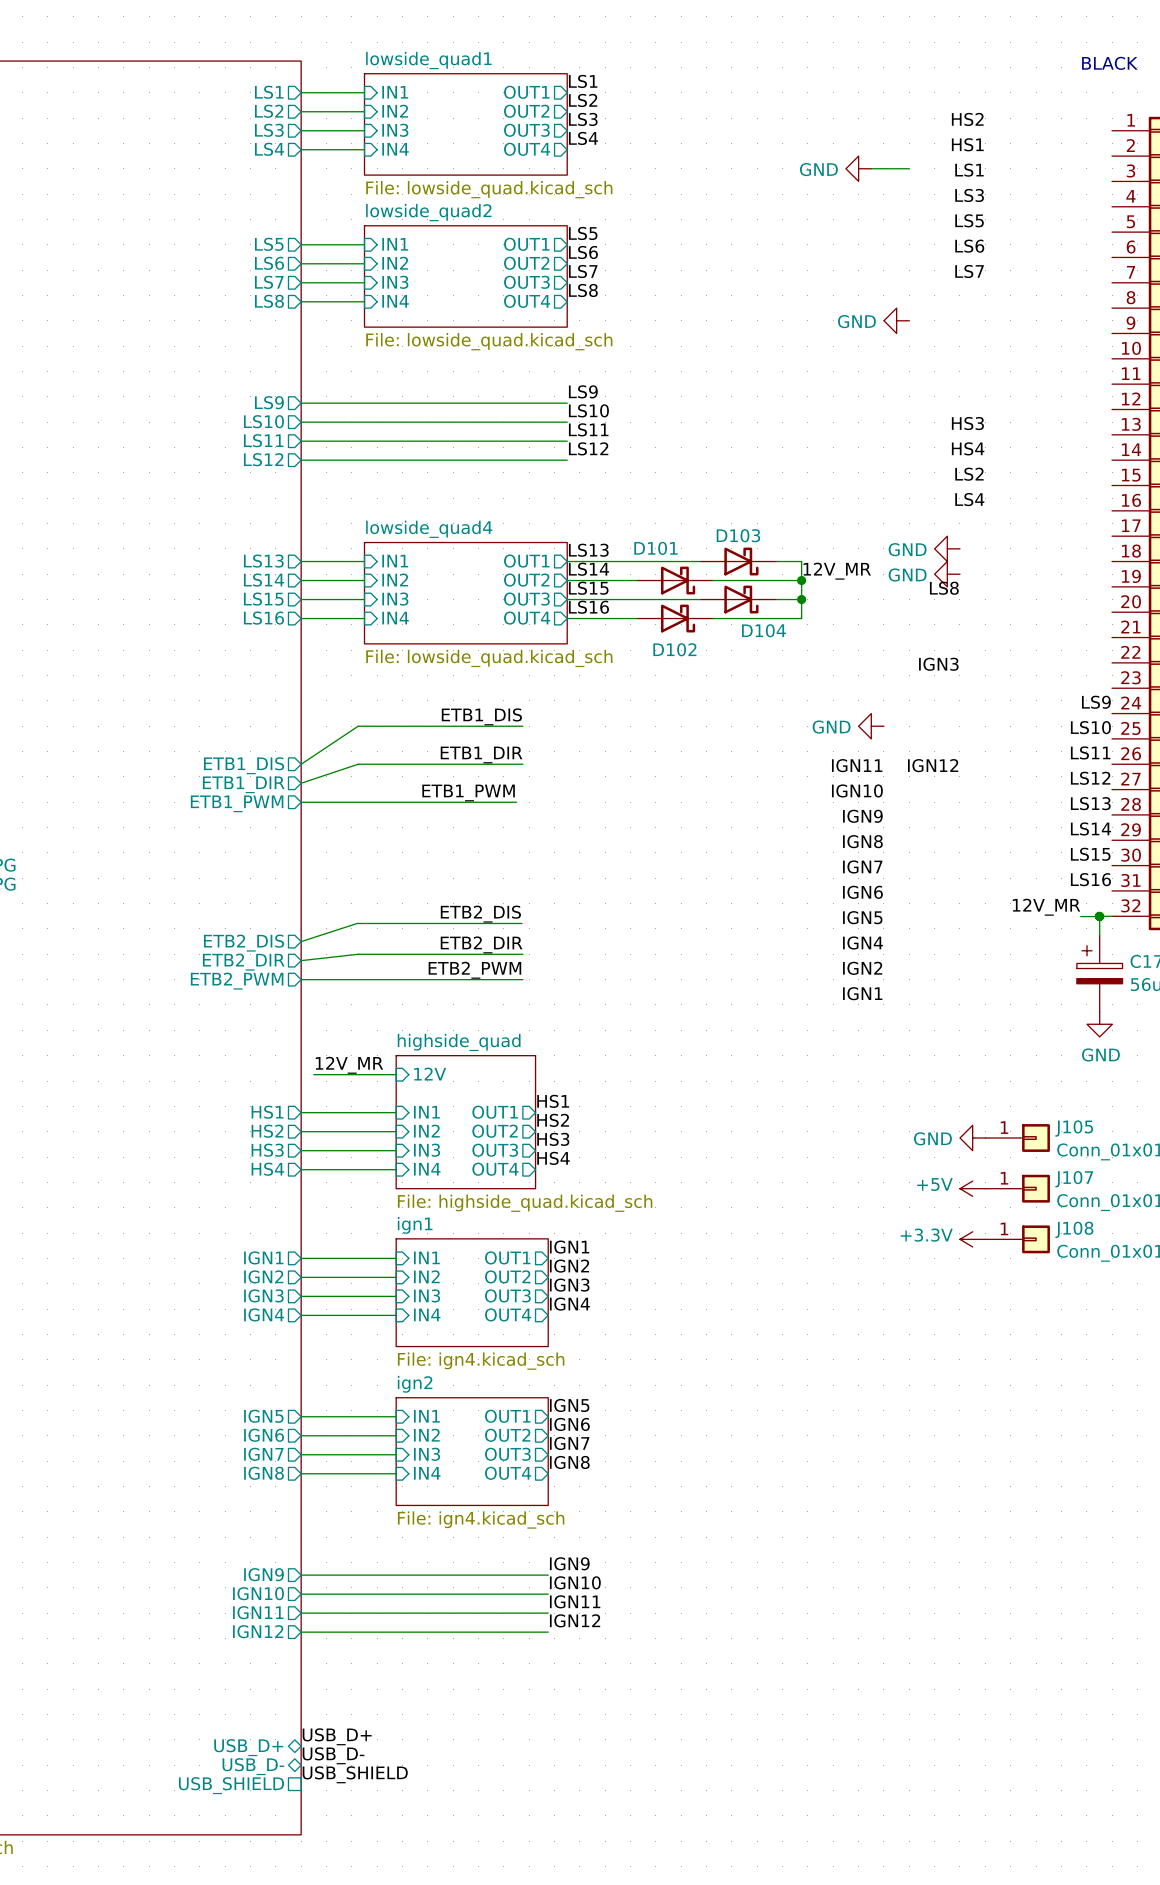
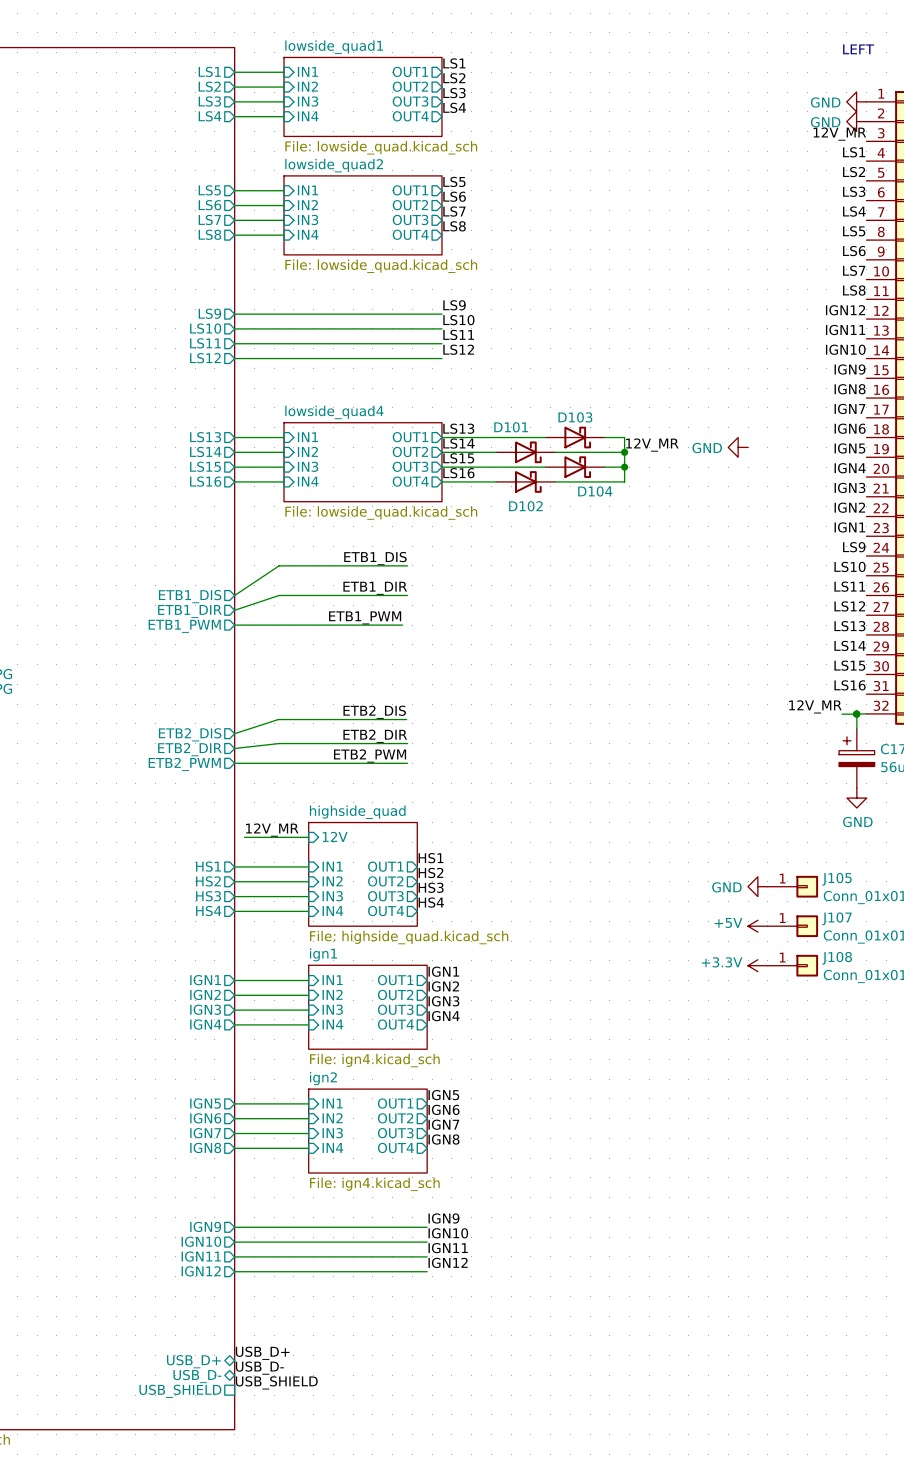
text: BLACK (1109, 63) -> LEFT (858, 49)
label: HS2 (967, 119) -> none
power symbol: none -> GND (856, 101)
label: HS1 (967, 144) -> none
power symbol: none -> GND (856, 121)
power symbol: GND (858, 168) -> none
wire: (871, 168) (909, 168) -> none
label position: LS1 (969, 170) -> LS1 (854, 152)
label: none -> 12V_MR (839, 134)
label position: LS3 (969, 195) -> LS3 (854, 191)
label position: LS5 (969, 220) -> LS5 (854, 231)
label: none -> LS2 (854, 172)
label position: LS6 (969, 246) -> LS6 (854, 251)
label position: LS7 (969, 271) -> LS7 (854, 270)
label: none -> LS4 (854, 211)
power symbol: GND (896, 320) -> none
label: none -> LS8 (854, 290)
label: none -> IGN12 (845, 310)
label: HS3 (967, 423) -> none
label: none -> IGN11 (845, 330)
label: HS4 (968, 448) -> none
label: none -> IGN10 (845, 349)
label: LS2 (969, 474) -> none
label: none -> IGN9 (850, 369)
label: LS4 (969, 499) -> none
label: none -> IGN8 (850, 389)
label: none -> IGN7 (849, 408)
power symbol: GND (947, 548) -> none
label: none -> IGN6 (850, 428)
label: none -> IGN5 (849, 448)
label: LS8 (944, 588) -> none
label: none -> IGN4 (850, 468)
label: none -> IGN2 (849, 507)
label position: IGN3 (938, 664) -> IGN3 (849, 487)
label: none -> IGN1 (849, 527)
power symbol: GND (871, 726) -> none
label: IGN11 (857, 765) -> none
label: IGN12 (933, 765) -> none
label: IGN10 (857, 790) -> none
label: IGN9 (862, 816) -> none
label: IGN8 (862, 841) -> none
label: IGN7 (862, 866) -> none
label: IGN6 (862, 892) -> none
label: IGN5 (862, 917) -> none
label: IGN4 (863, 943) -> none
label: IGN2 (862, 968) -> none
label: IGN1 (862, 993) -> none

